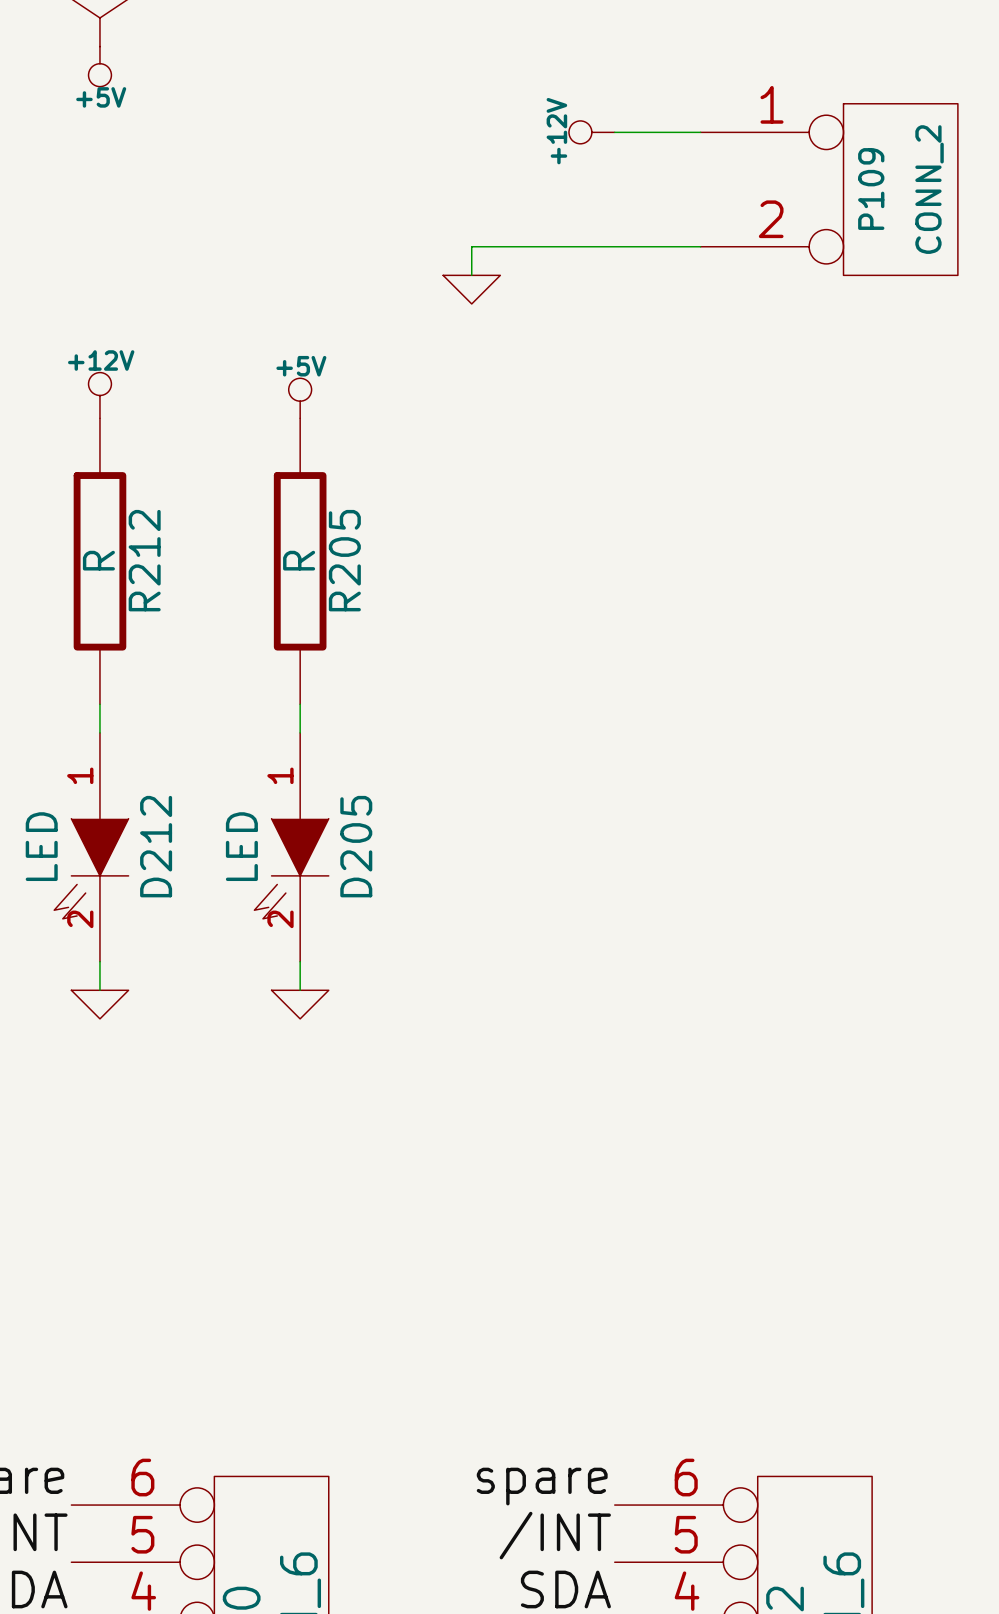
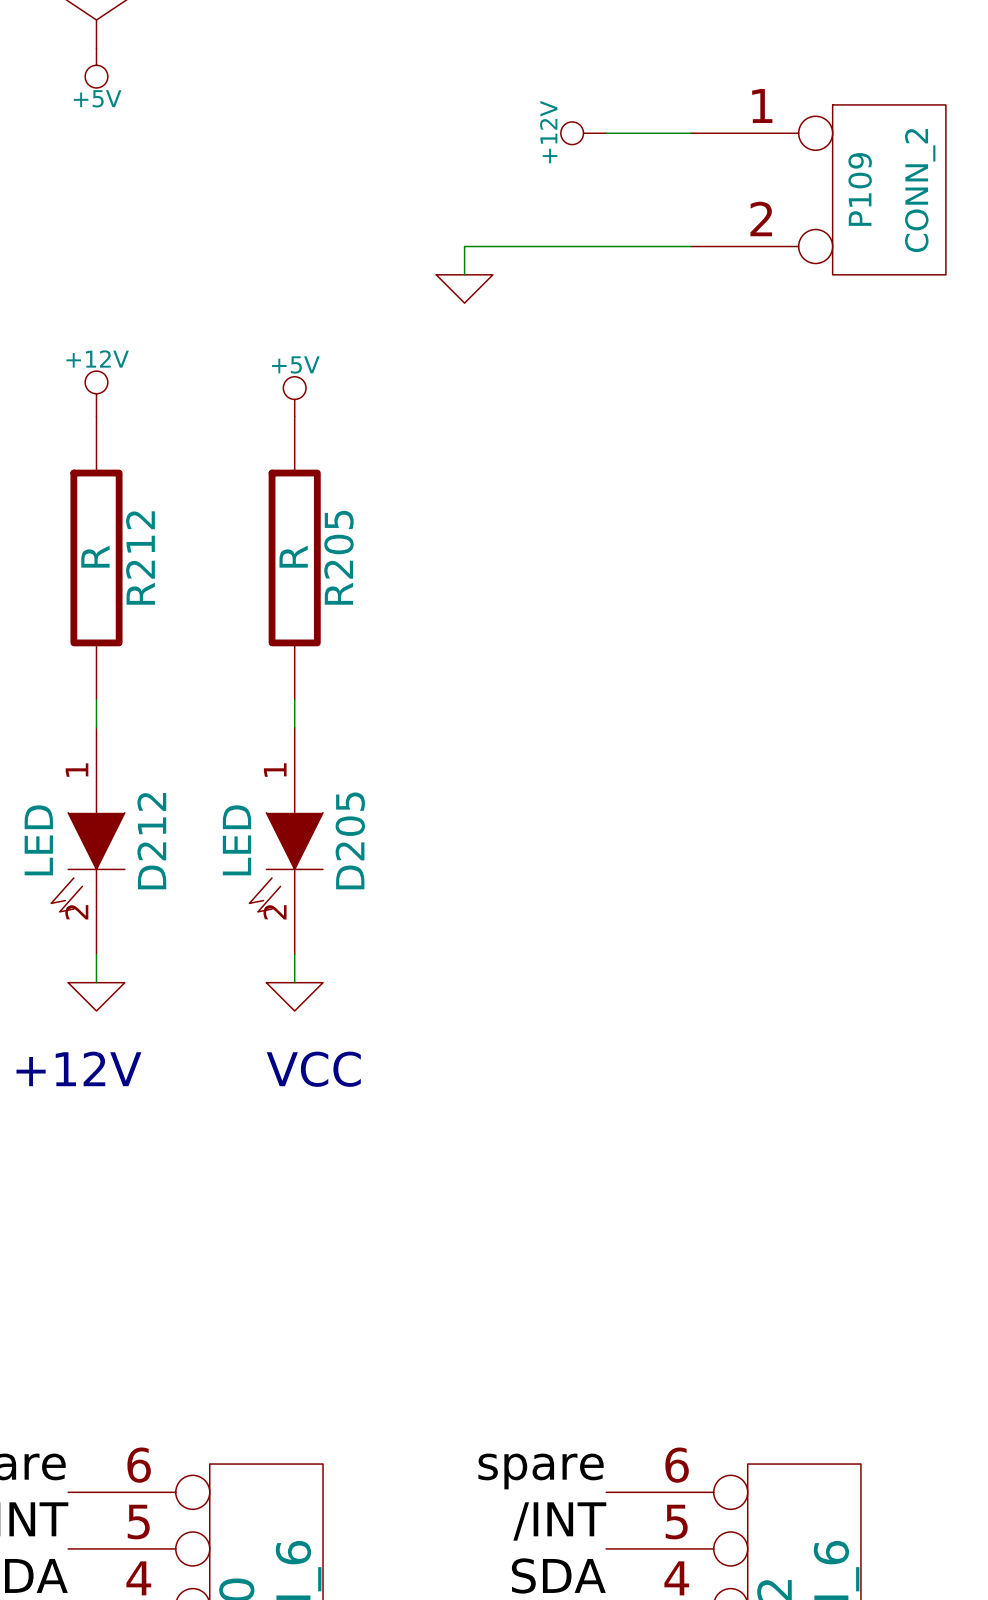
text: none -> +12V (78, 1068)
text: none -> VCC (313, 1069)

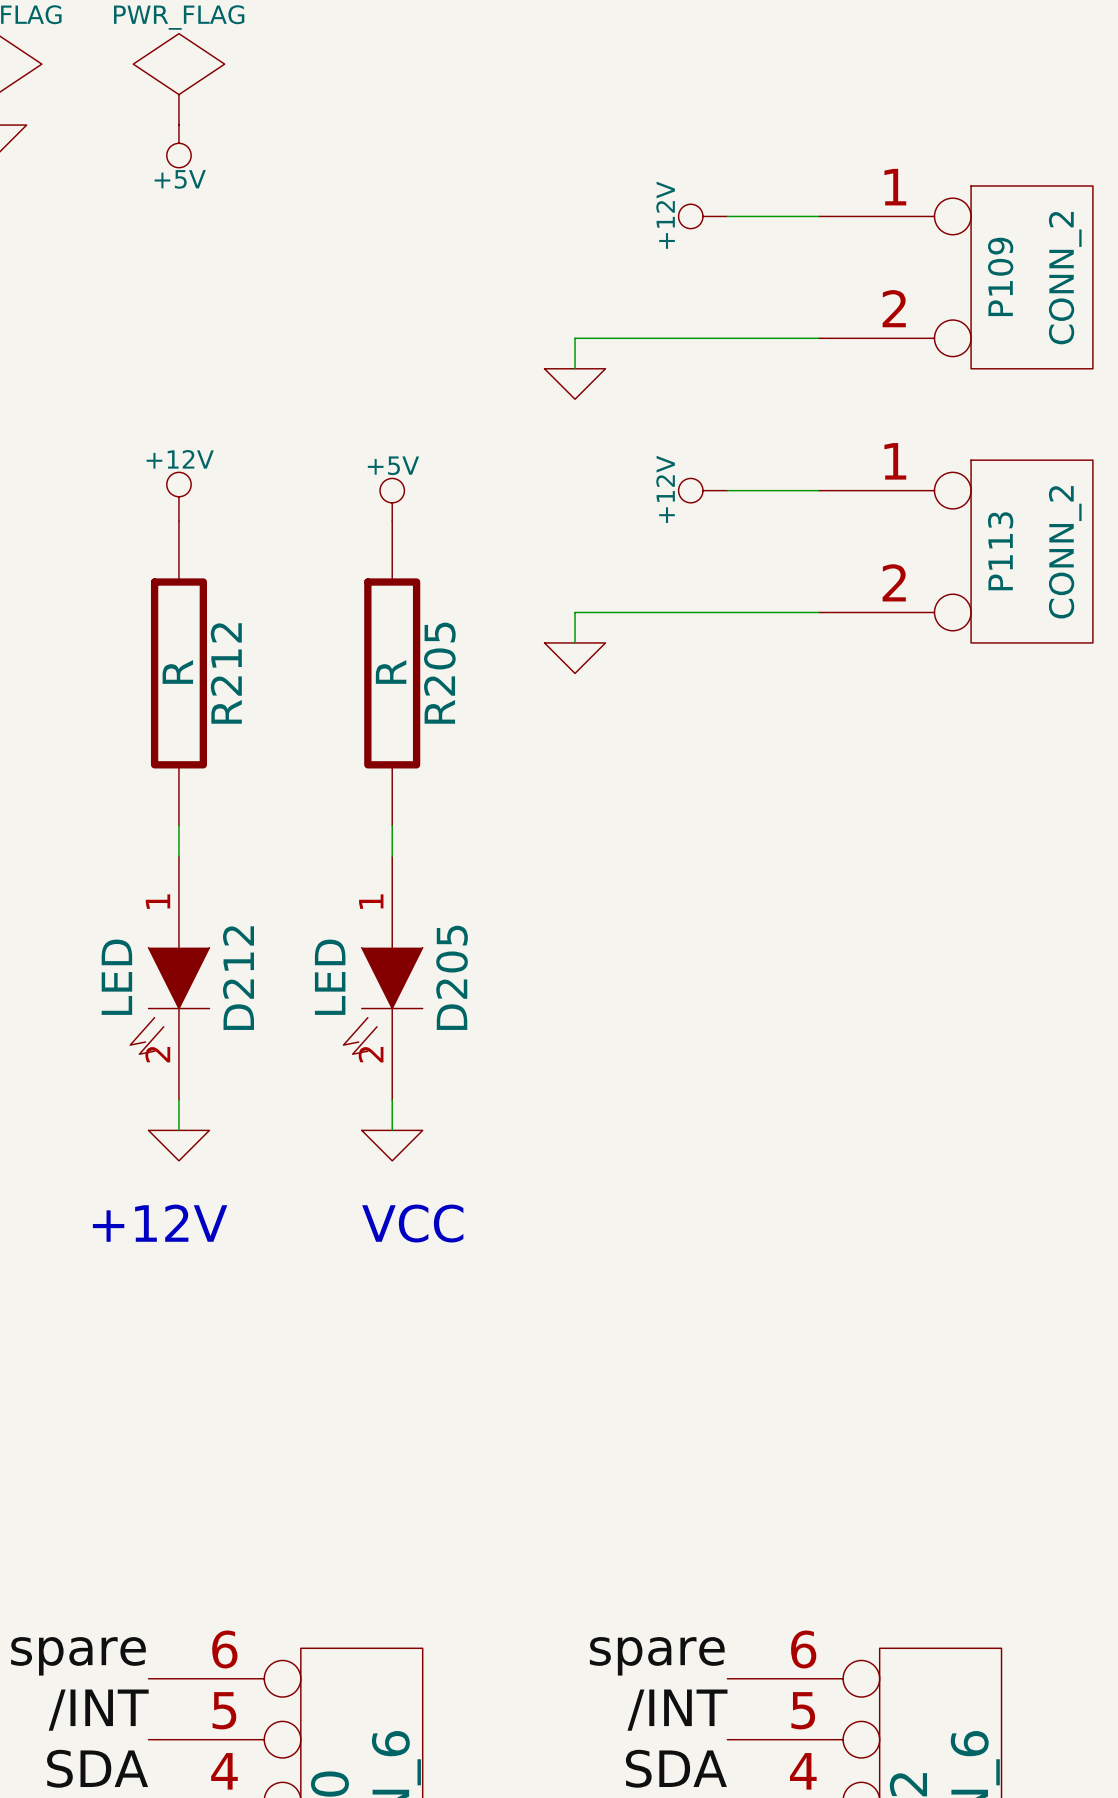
power symbol: none -> +12V (702, 490)
wire: none -> (727, 490) (818, 490)
P113: none -> CONN_2 (955, 551)
wire: none -> (818, 612) (575, 612) (575, 642)
power symbol: none -> (575, 658)

